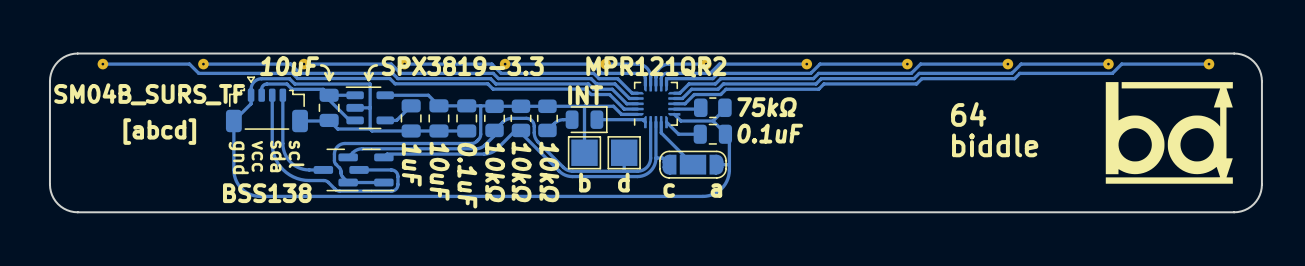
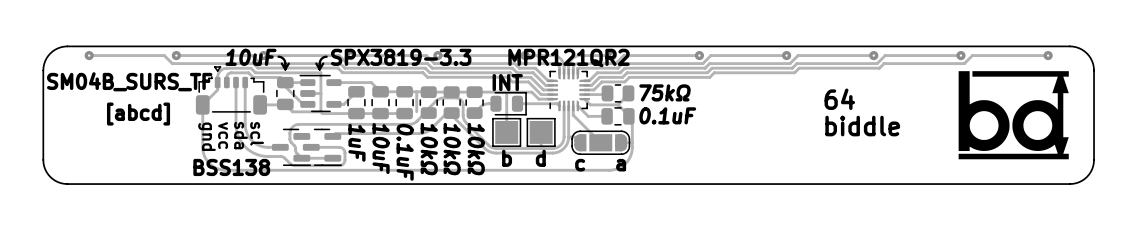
track: (534, 126) (532, 121) (528, 118) (507, 119) (494, 130) (494, 135) (484, 145) (478, 148) (360, 148) (354, 151) (348, 157) -> none
track: (480, 128) (479, 138) (471, 143) -> (463, 109) (462, 102) (458, 98) (440, 98) (416, 121) (408, 124)

